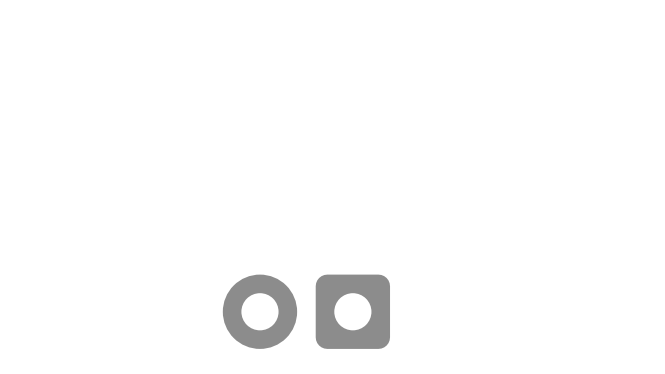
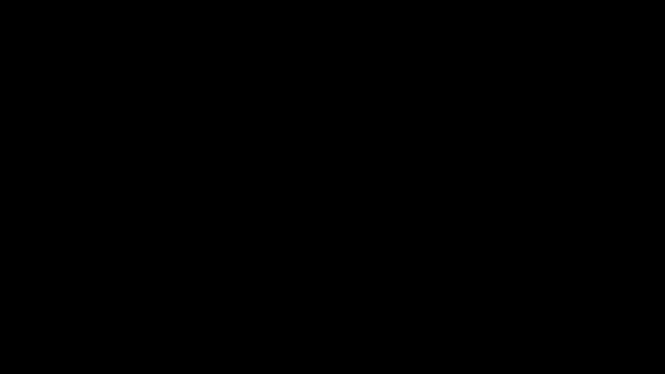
part: (306, 311) -> none

